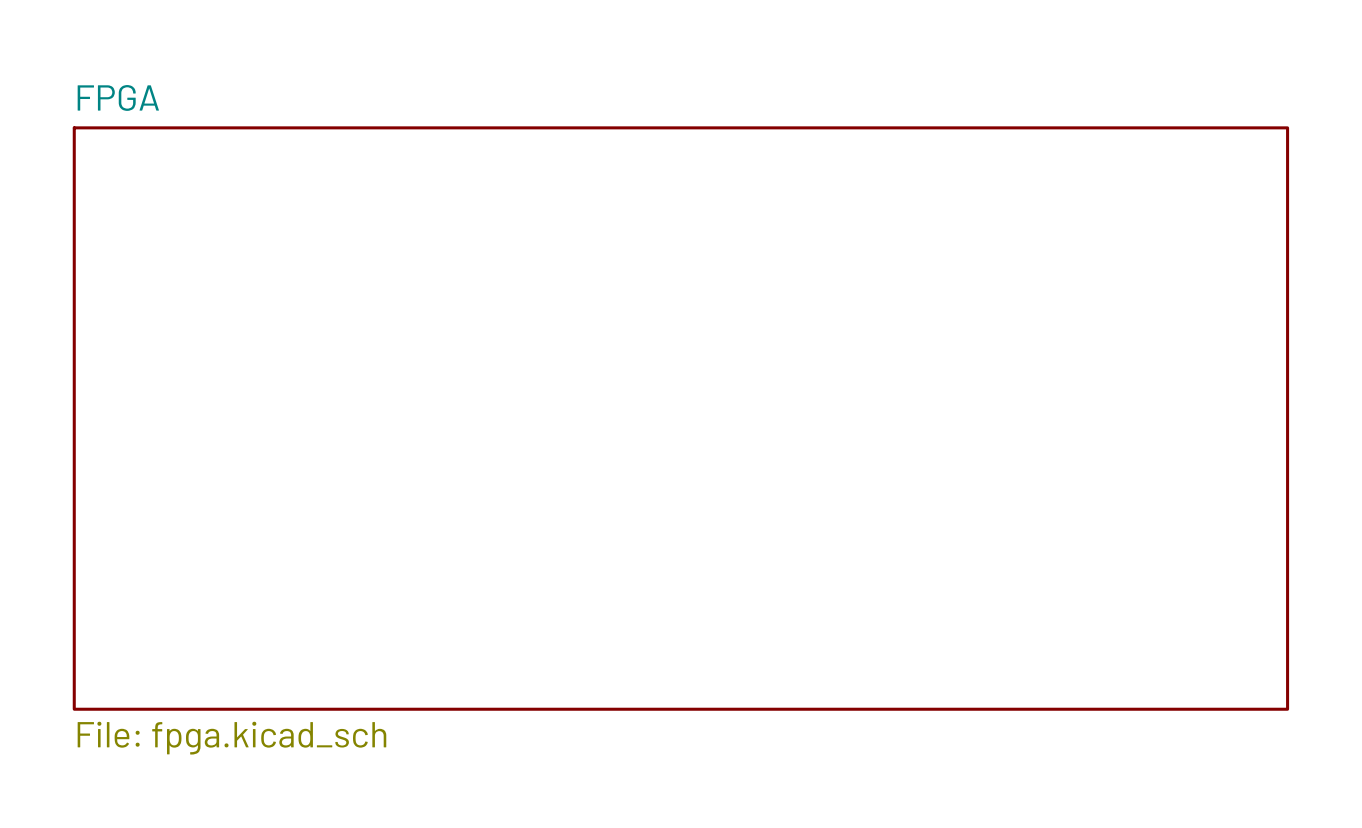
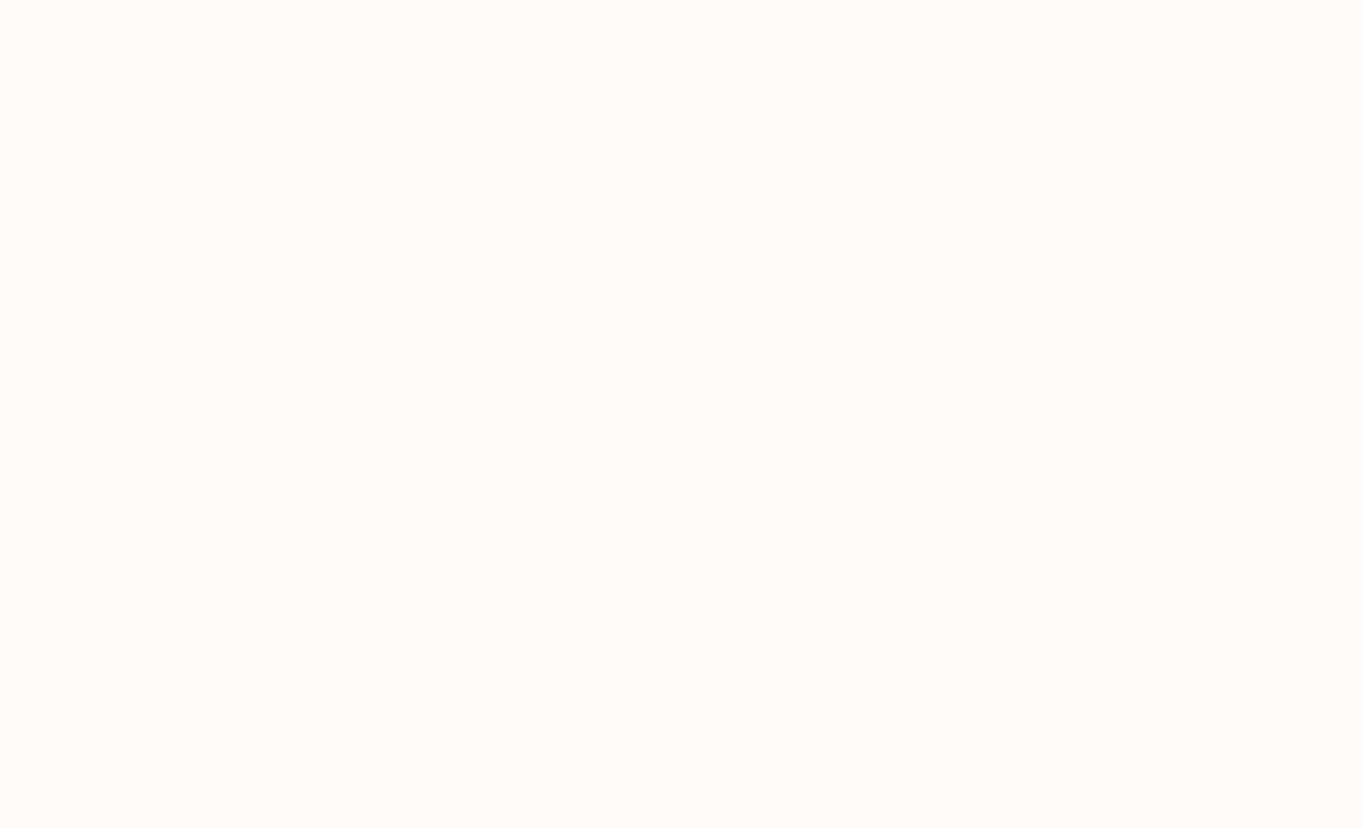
sheet FPGA: File: fpga.kicad_sch (680, 418) -> none

